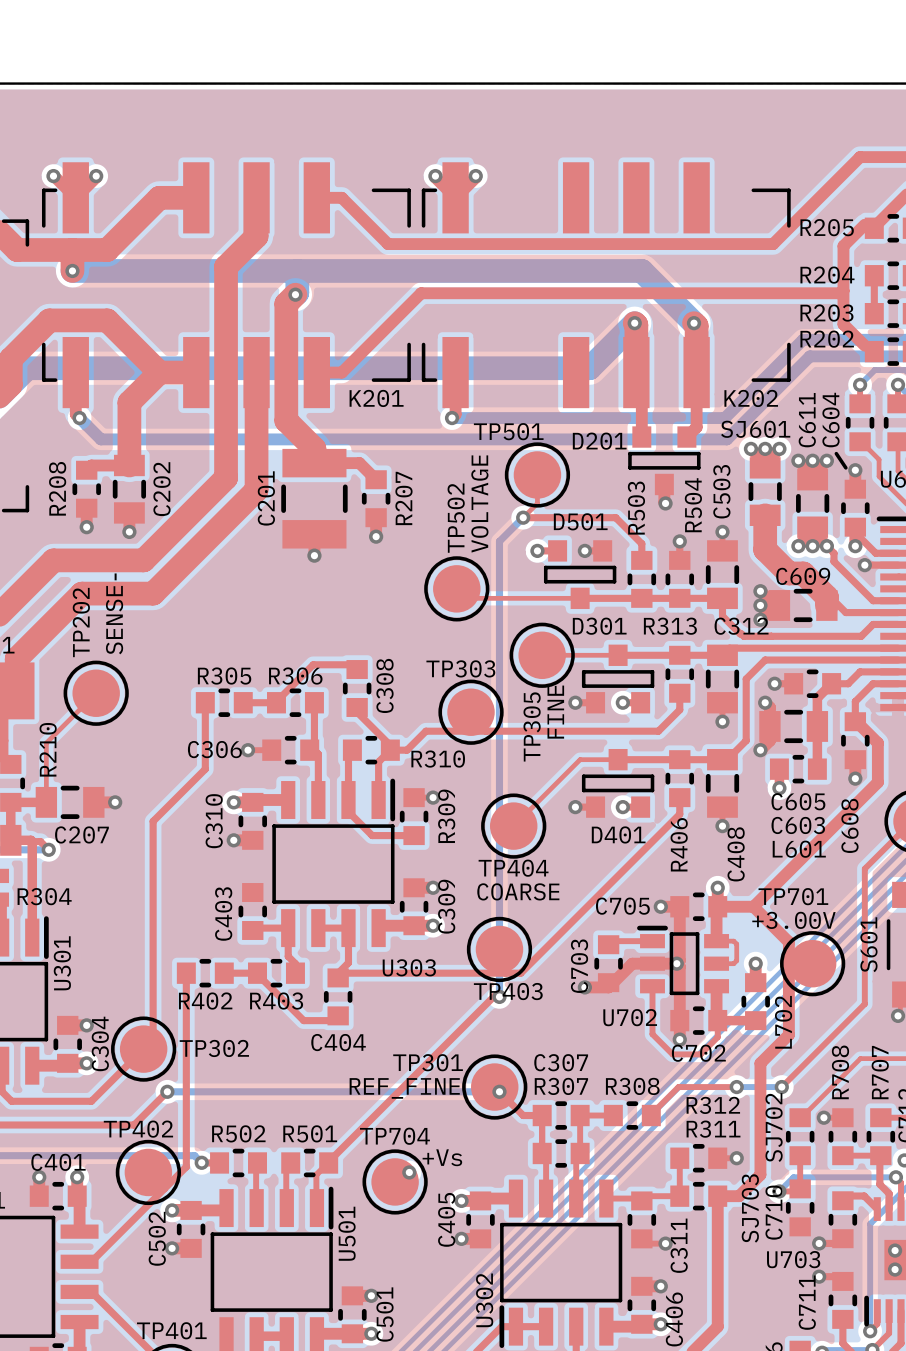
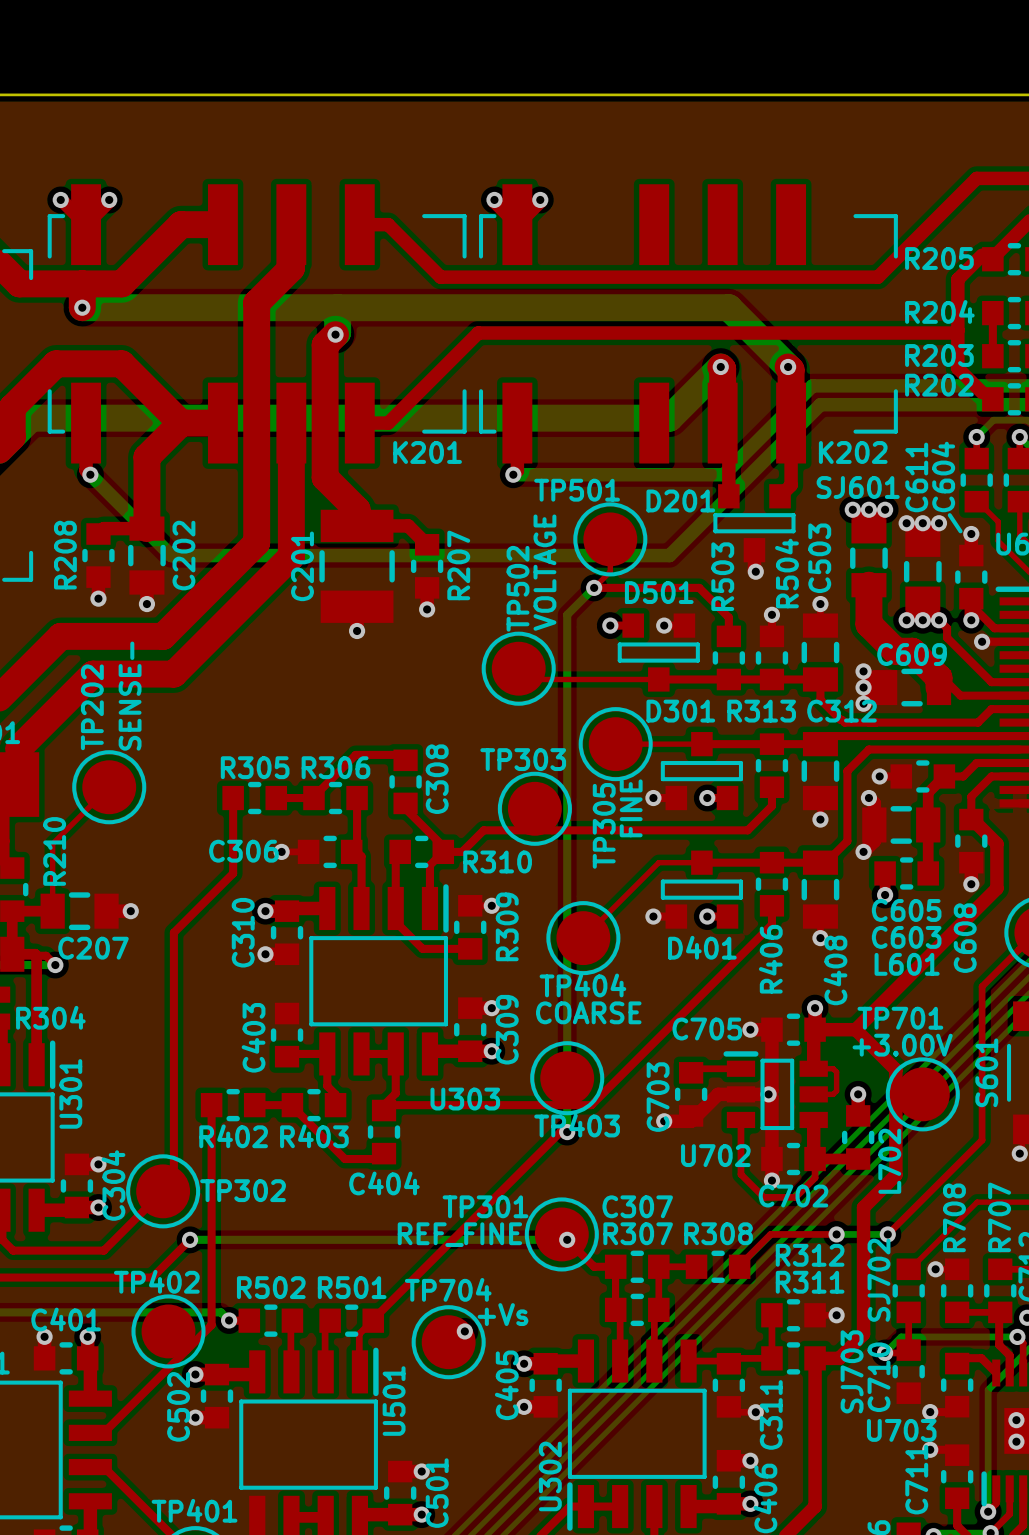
bottom track: (803, 339) (724, 418) (637, 418) -> (912, 385) (812, 385) (723, 474)
bottom track: (809, 356) (726, 439) (100, 439) -> (919, 404) (820, 404) (669, 555) (171, 555) (114, 498)

